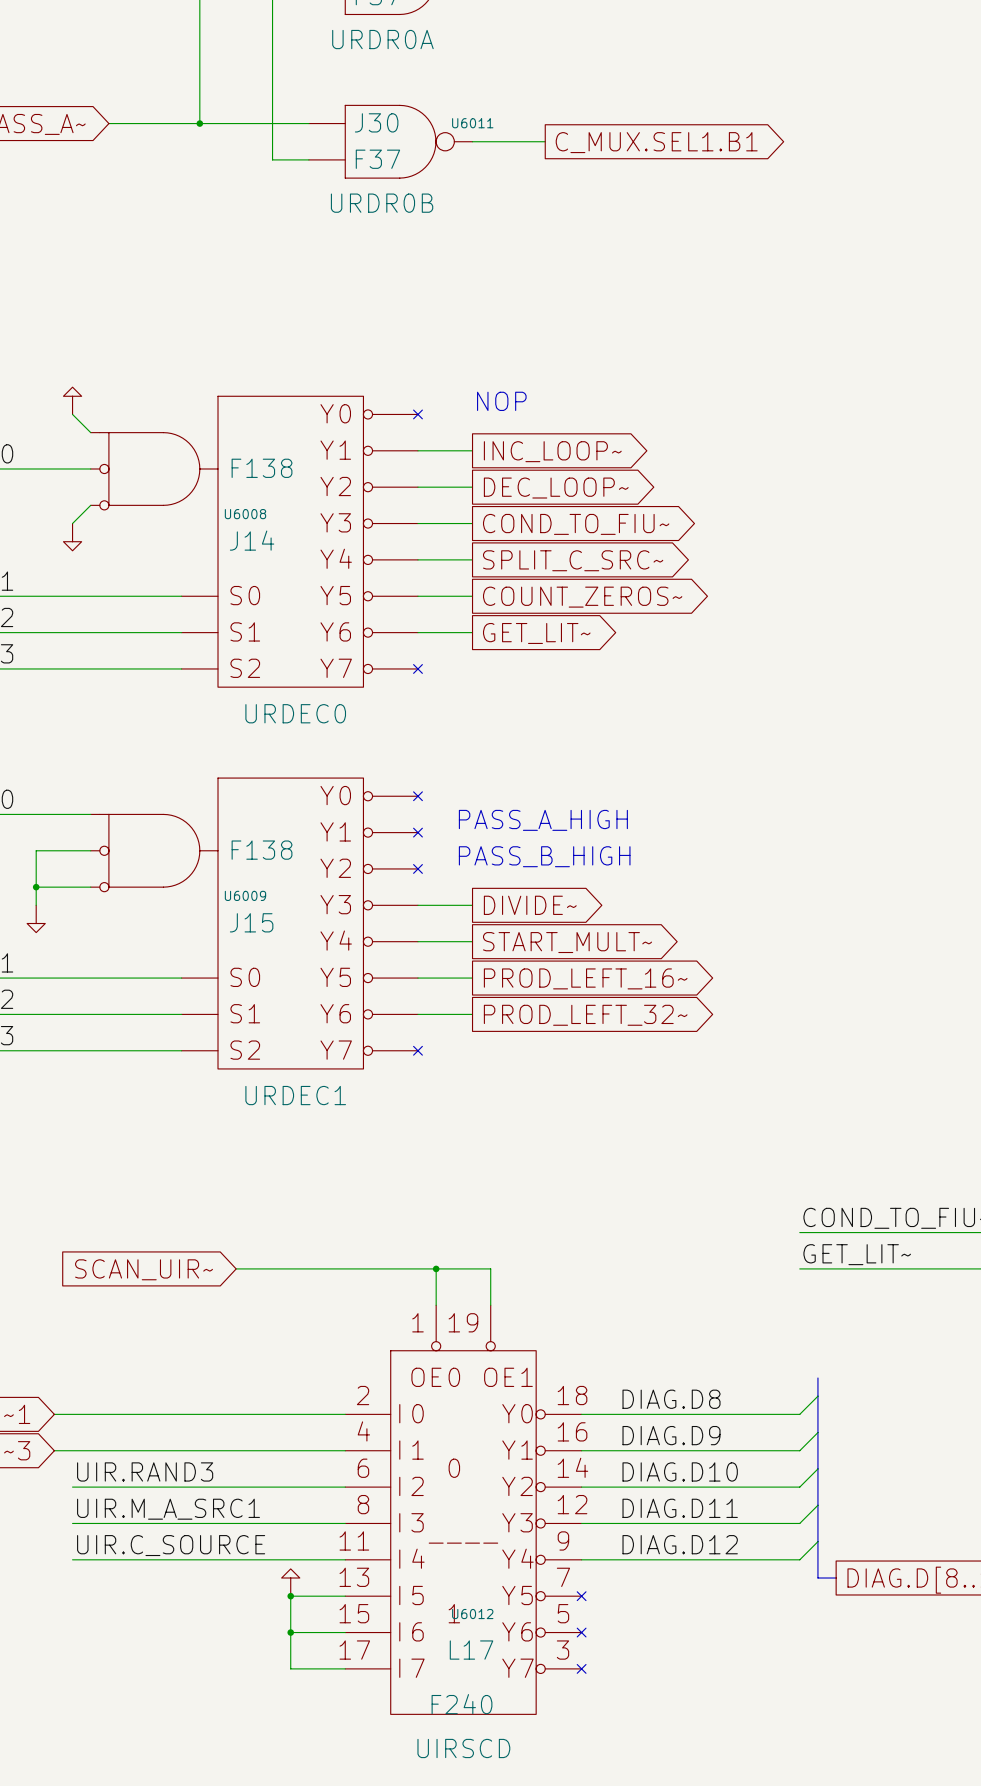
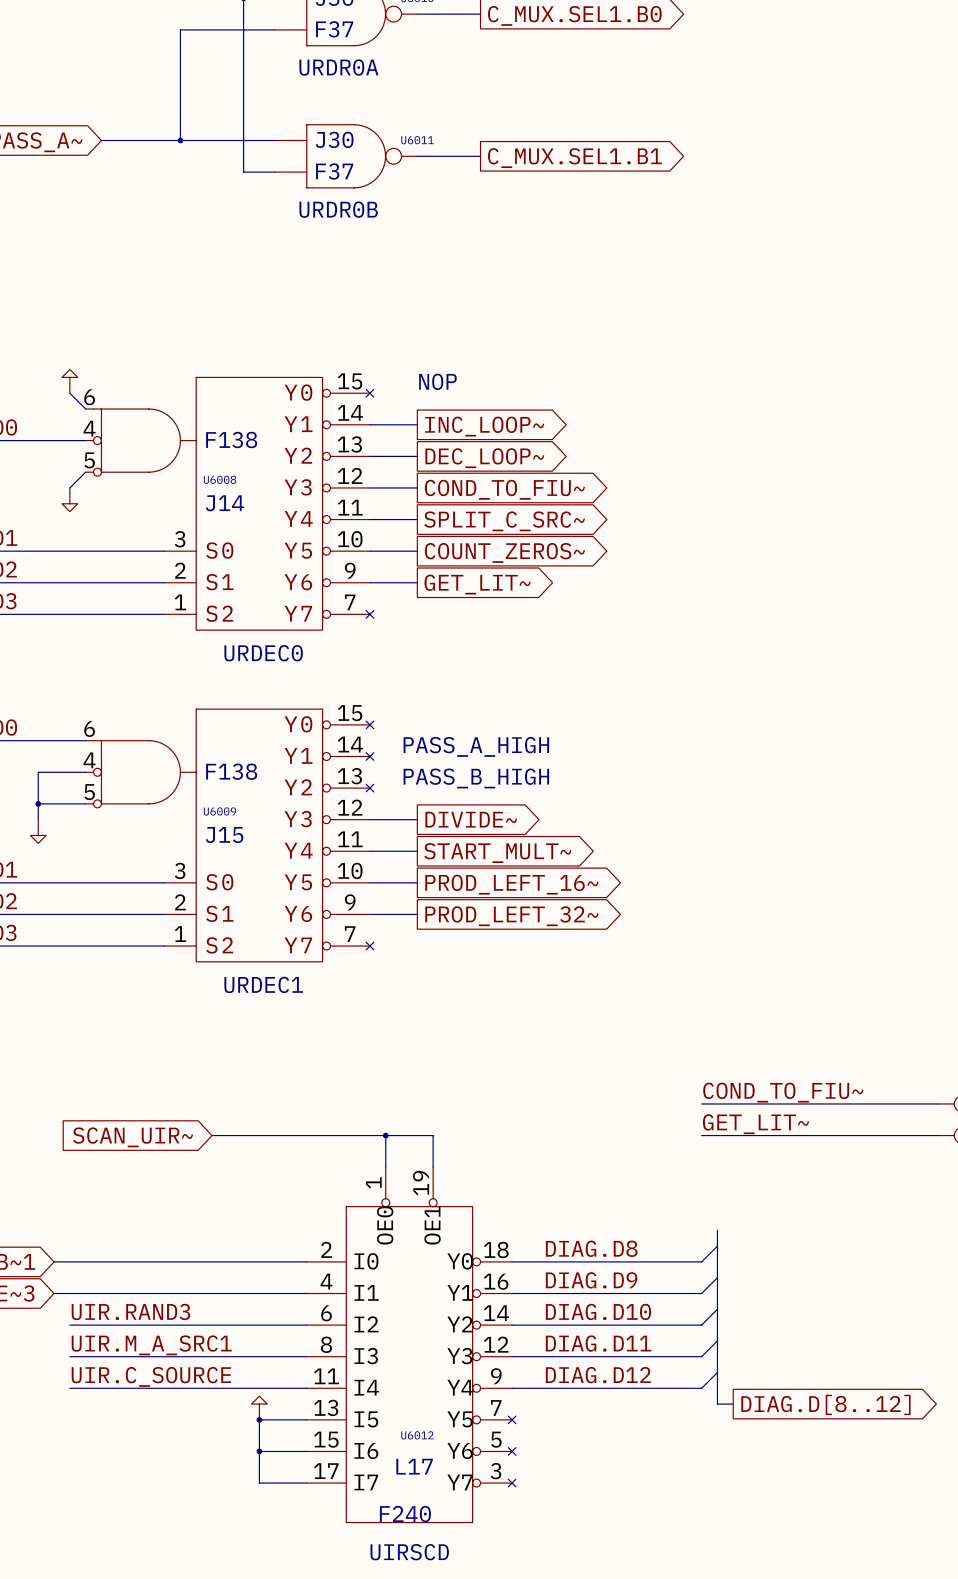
U6008 symbol: [90, 395, 418, 688] -> [85, 376, 370, 631]
U6009 symbol: [90, 777, 418, 1070] -> [85, 708, 370, 963]
U6012 symbol: [345, 1305, 582, 1715] -> [306, 1167, 513, 1523]

